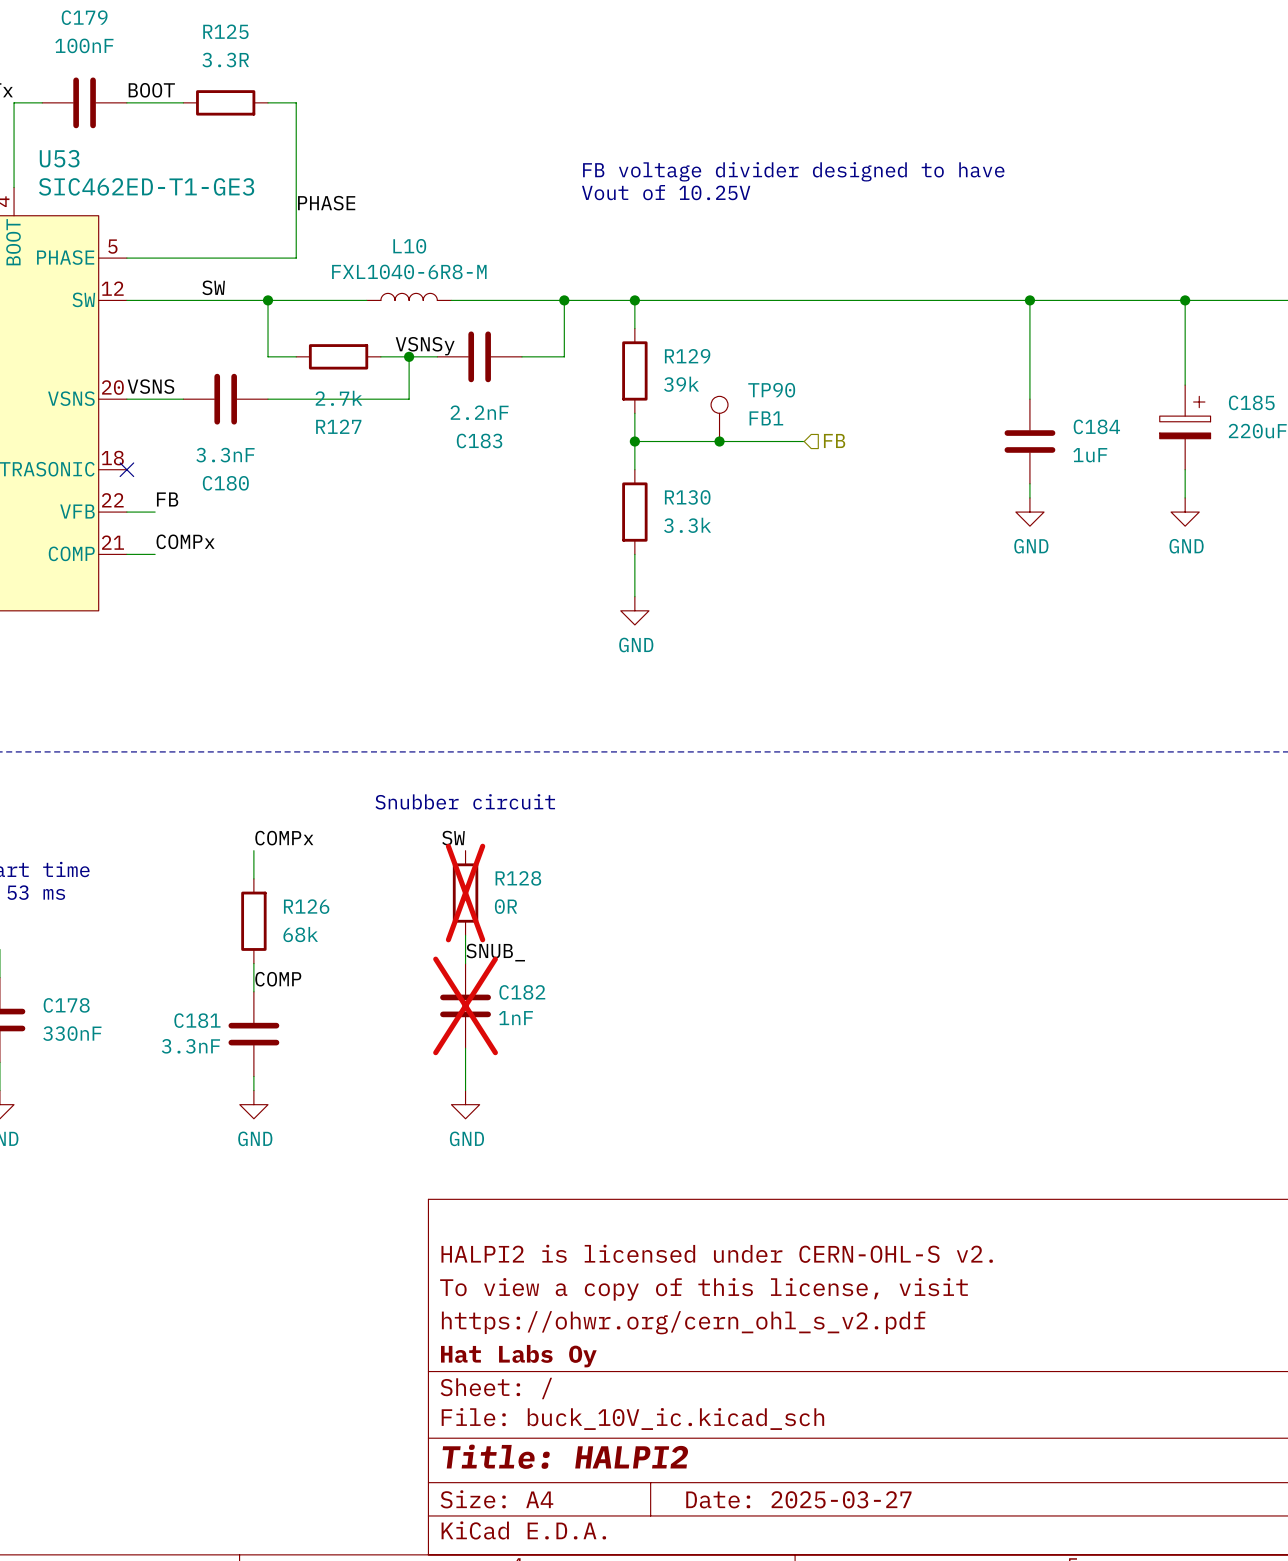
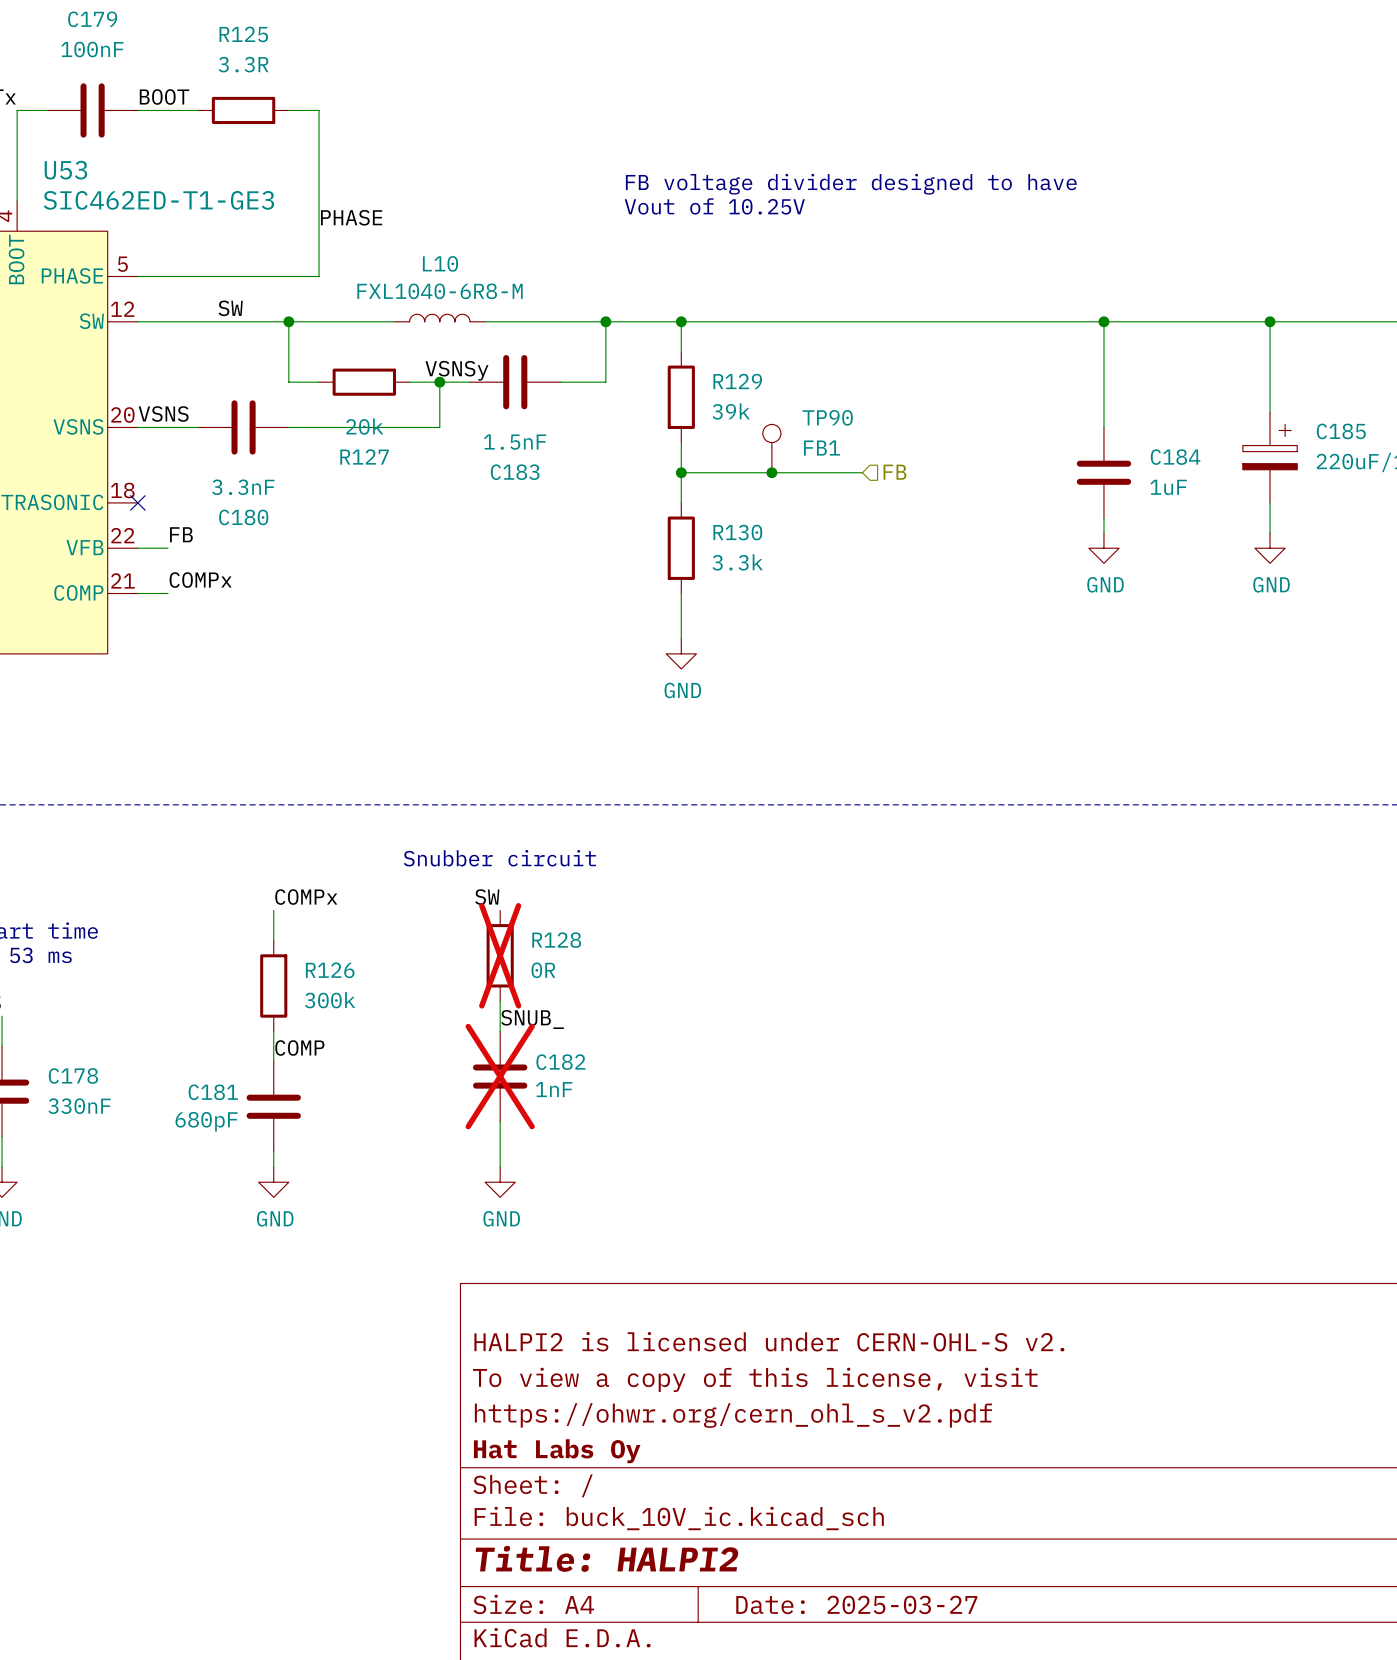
R127 value: 2.7k (338, 398) -> 20k (364, 426)
C183 value: 2.2nF (479, 412) -> 1.5nF (515, 442)
R126 value: 68k (300, 934) -> 300k (330, 1000)
C181 value: 3.3nF (190, 1046) -> 680pF (206, 1121)

